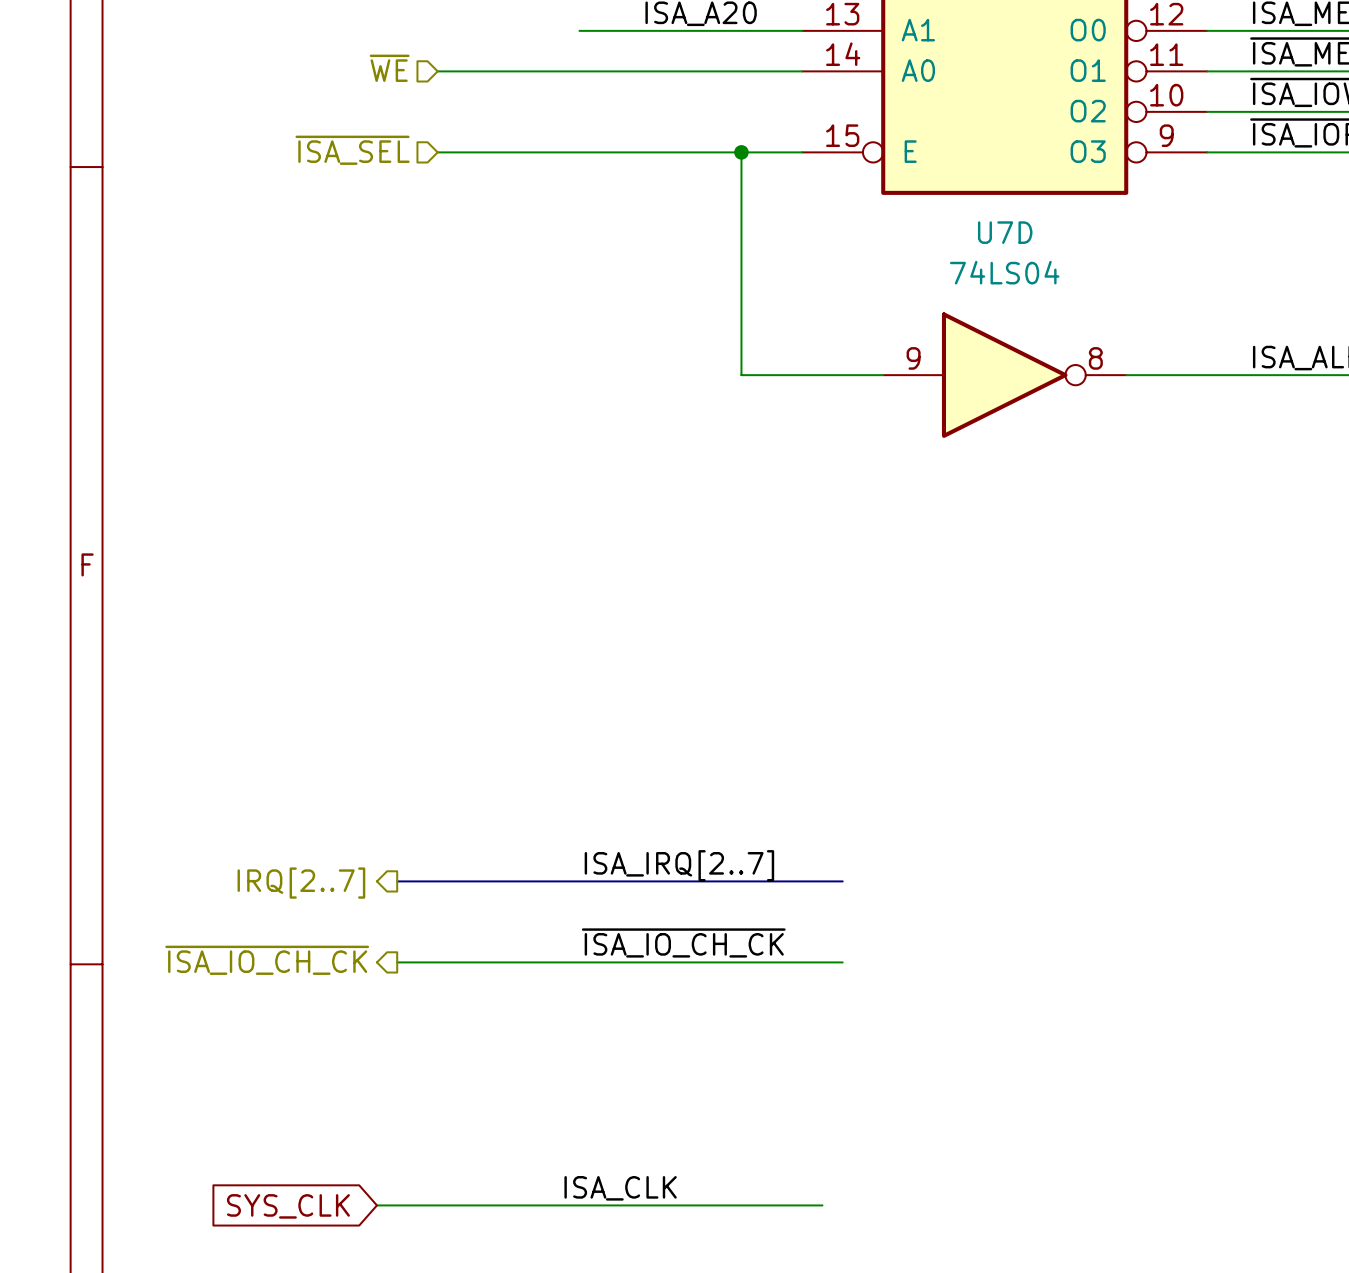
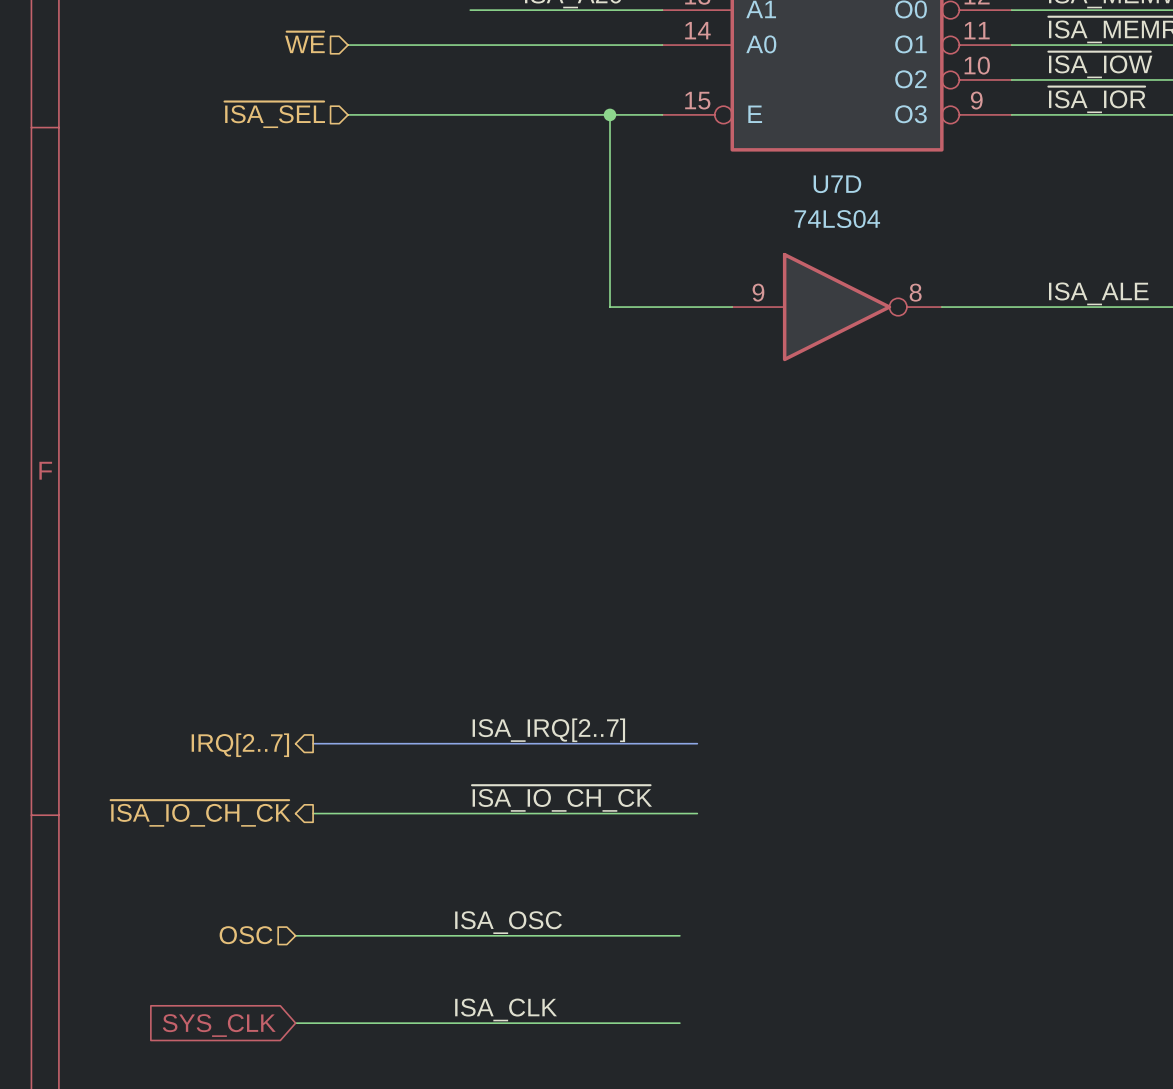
label: none -> ISA_OSC (508, 922)
hierarchical label: none -> OSC (246, 935)
wire: none -> (295, 935) (679, 935)

